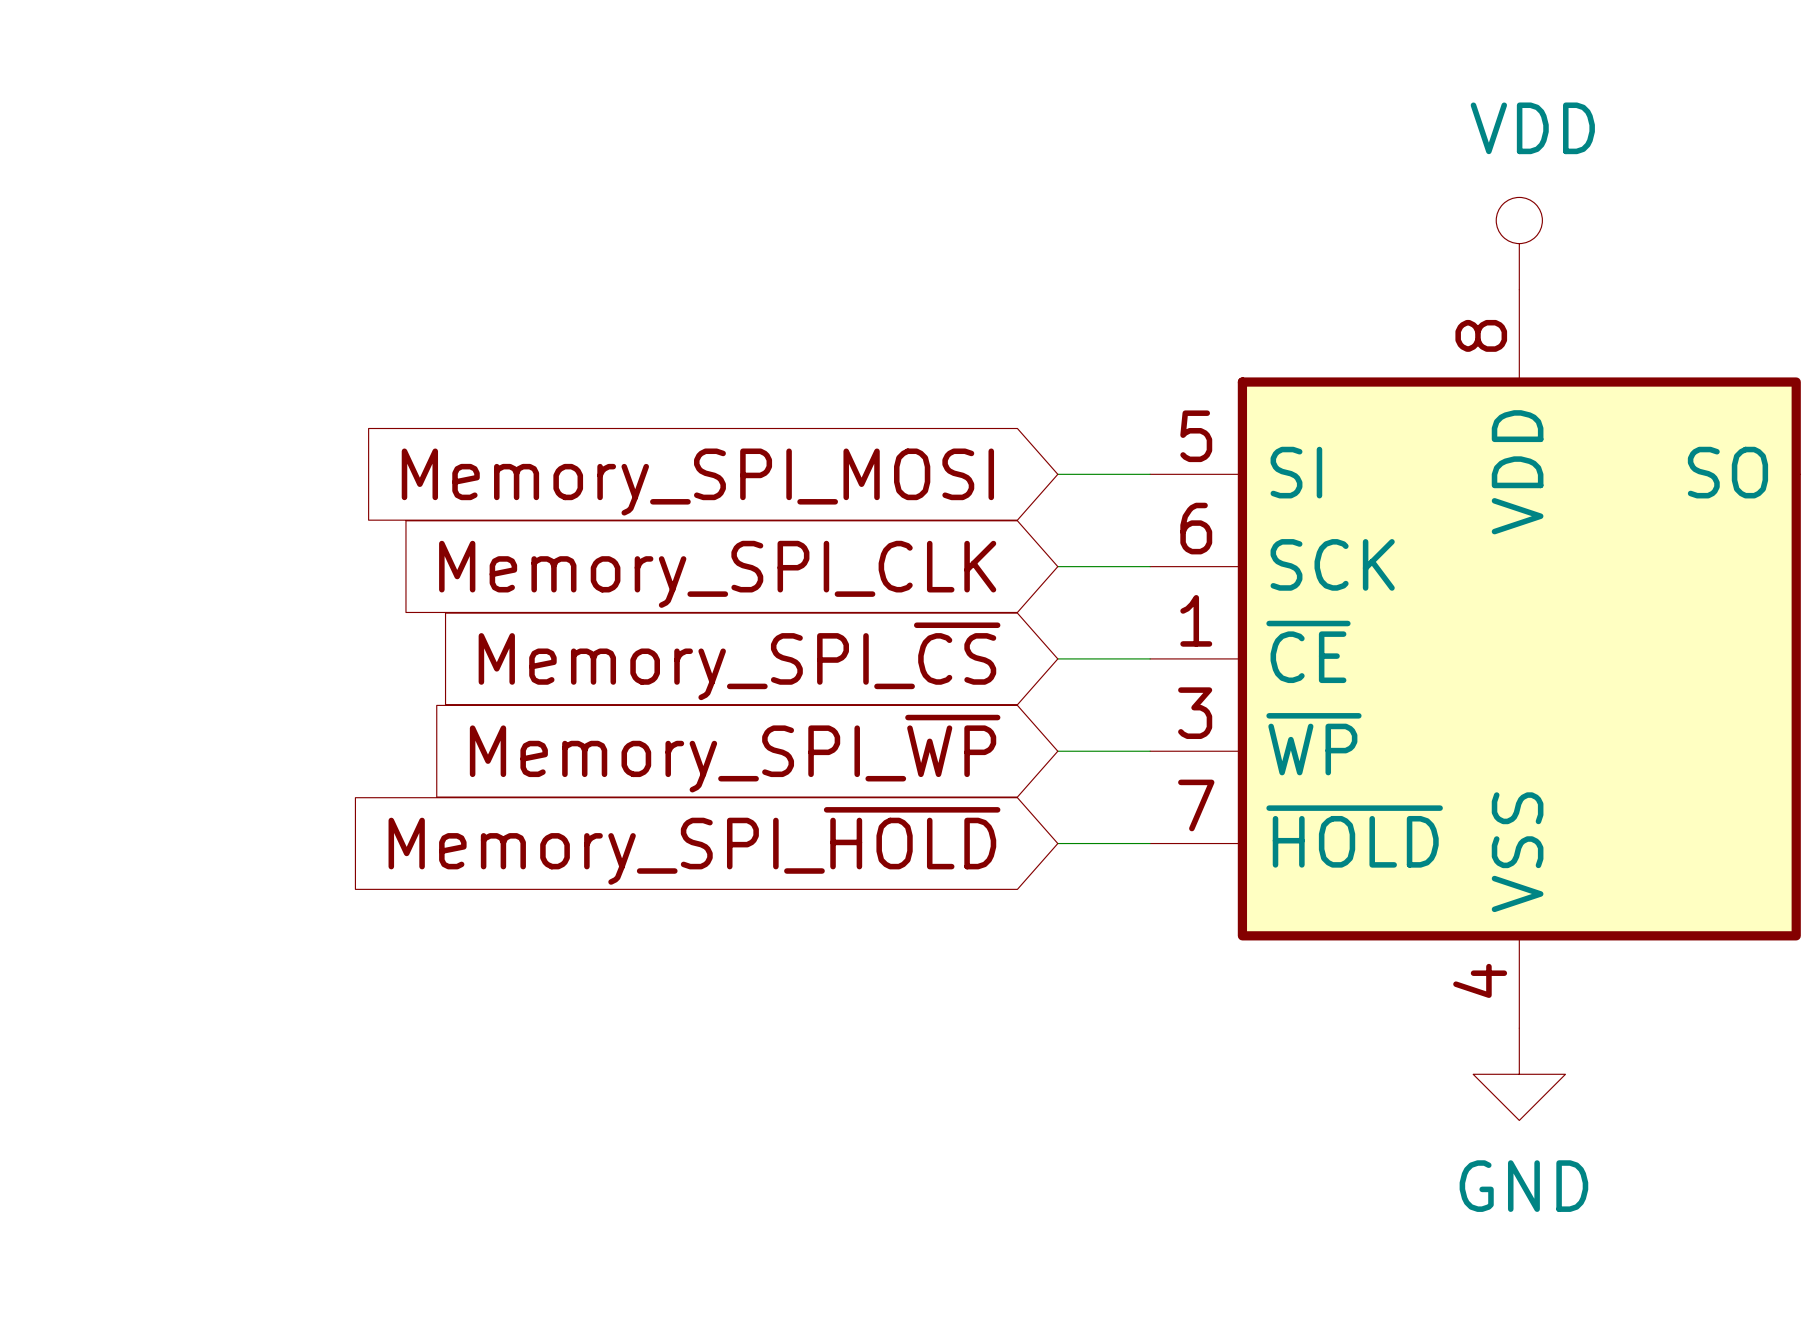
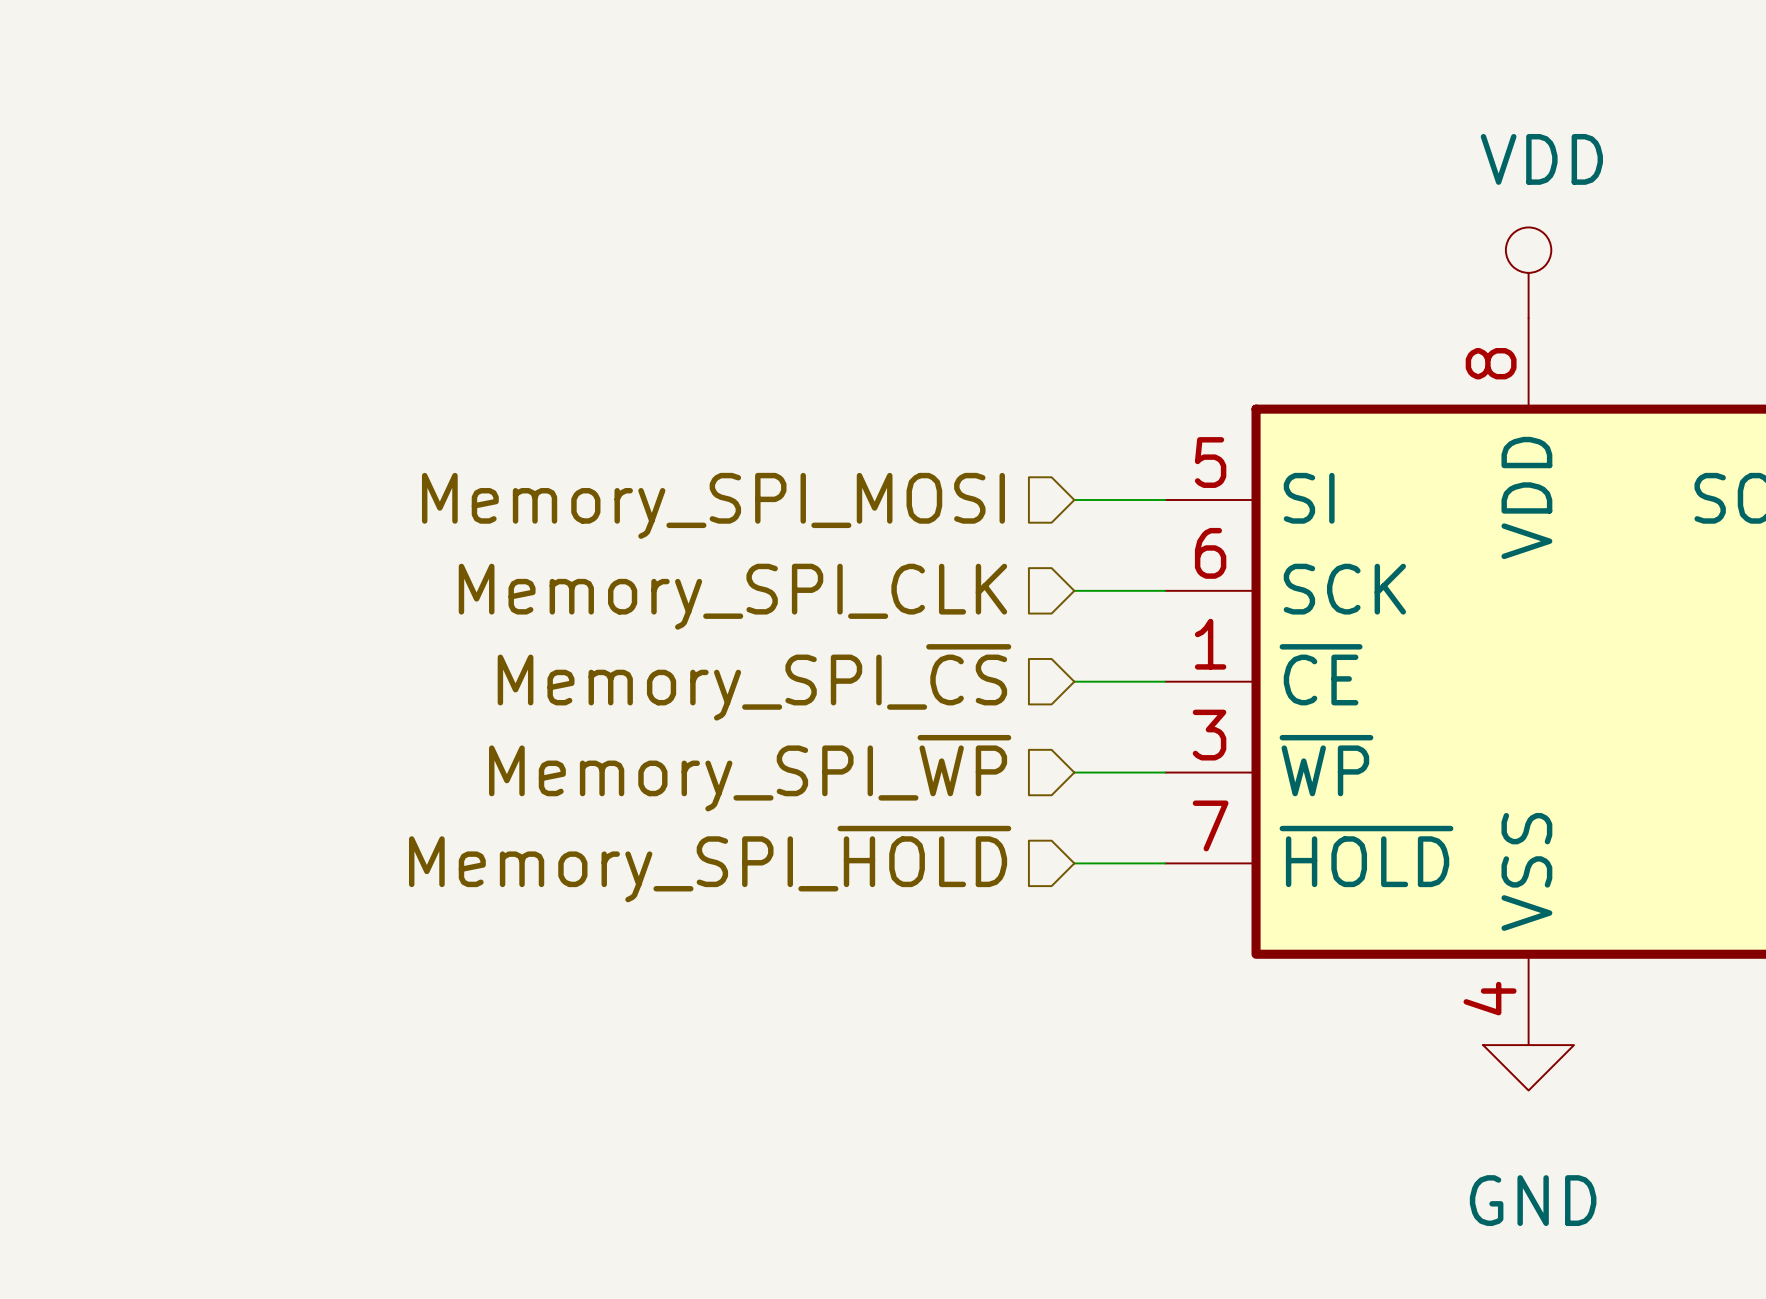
hierarchical label: none -> Memory_SPI_MOSI (713, 505)
global label: Memory_SPI_MOSI (697, 482) -> none
hierarchical label: none -> Memory_SPI_CLK (732, 596)
global label: Memory_SPI_CLK (717, 574) -> none
hierarchical label: none -> Memory_SPI_~{CS} (754, 682)
global label: Memory_SPI_~{CS} (739, 661) -> none
hierarchical label: none -> Memory_SPI_~{WP} (750, 773)
global label: Memory_SPI_~{WP} (735, 753) -> none
hierarchical label: none -> Memory_SPI_~{HOLD} (710, 864)
global label: Memory_SPI_~{HOLD} (694, 845) -> none
power symbol shape: [1473, 1028, 1566, 1121] -> [1483, 1045, 1575, 1091]

